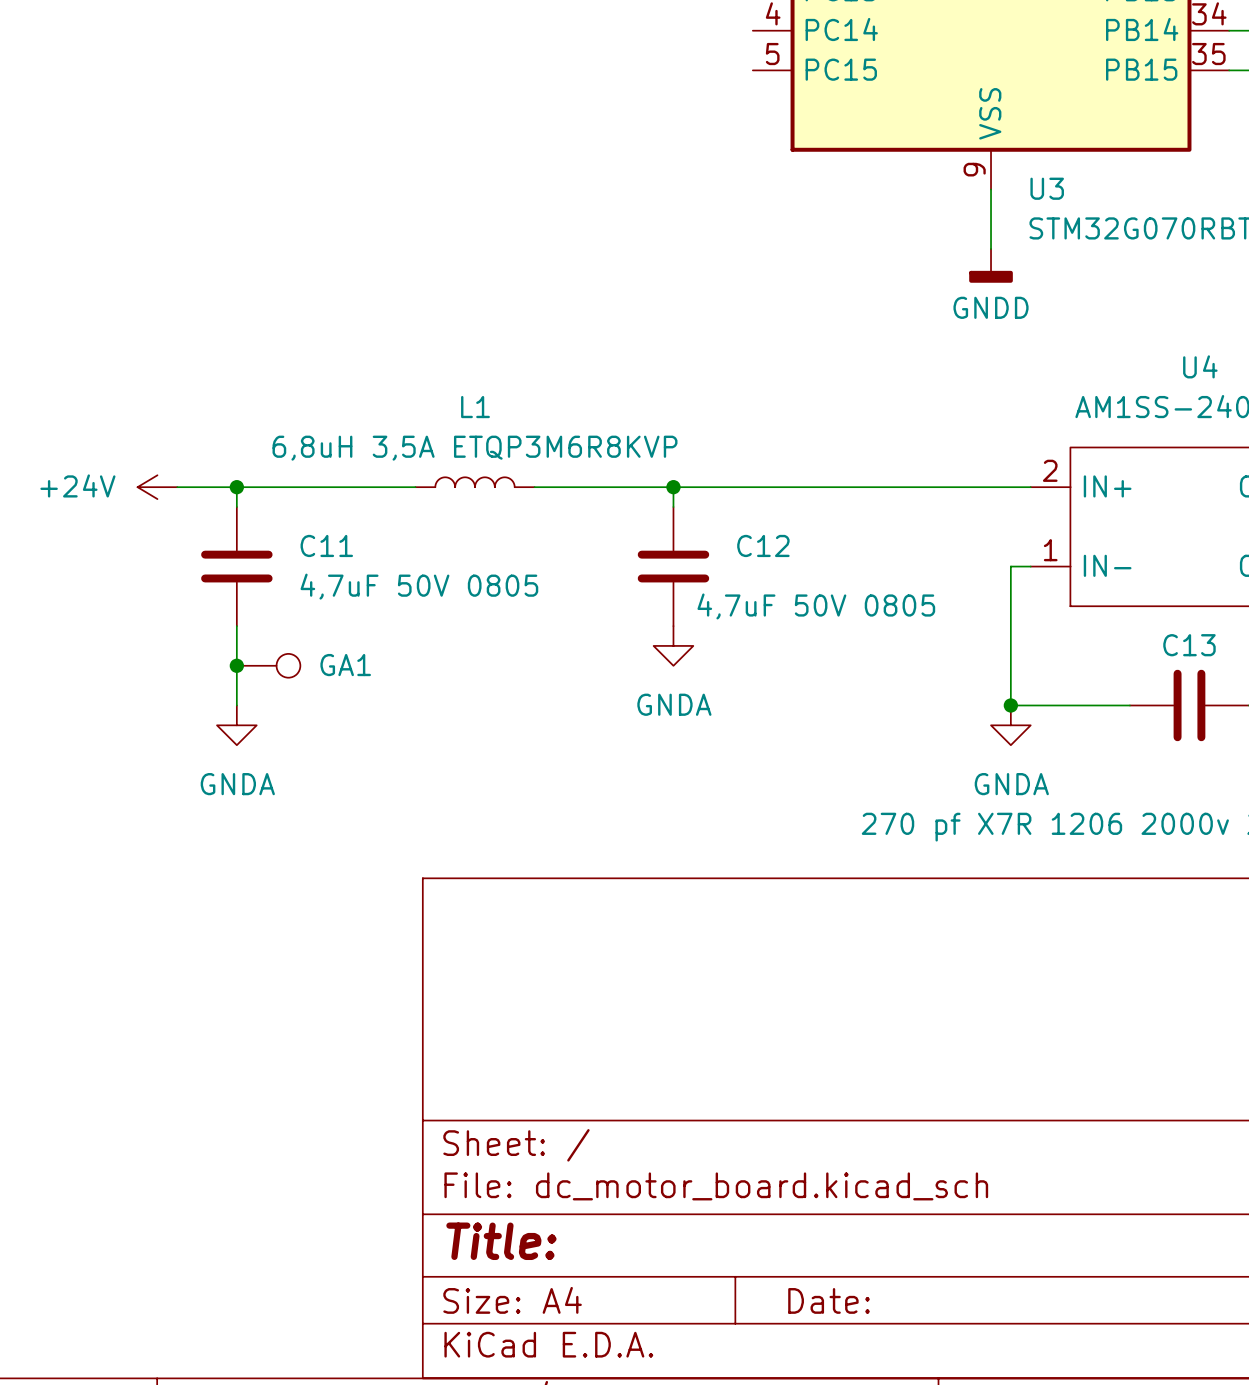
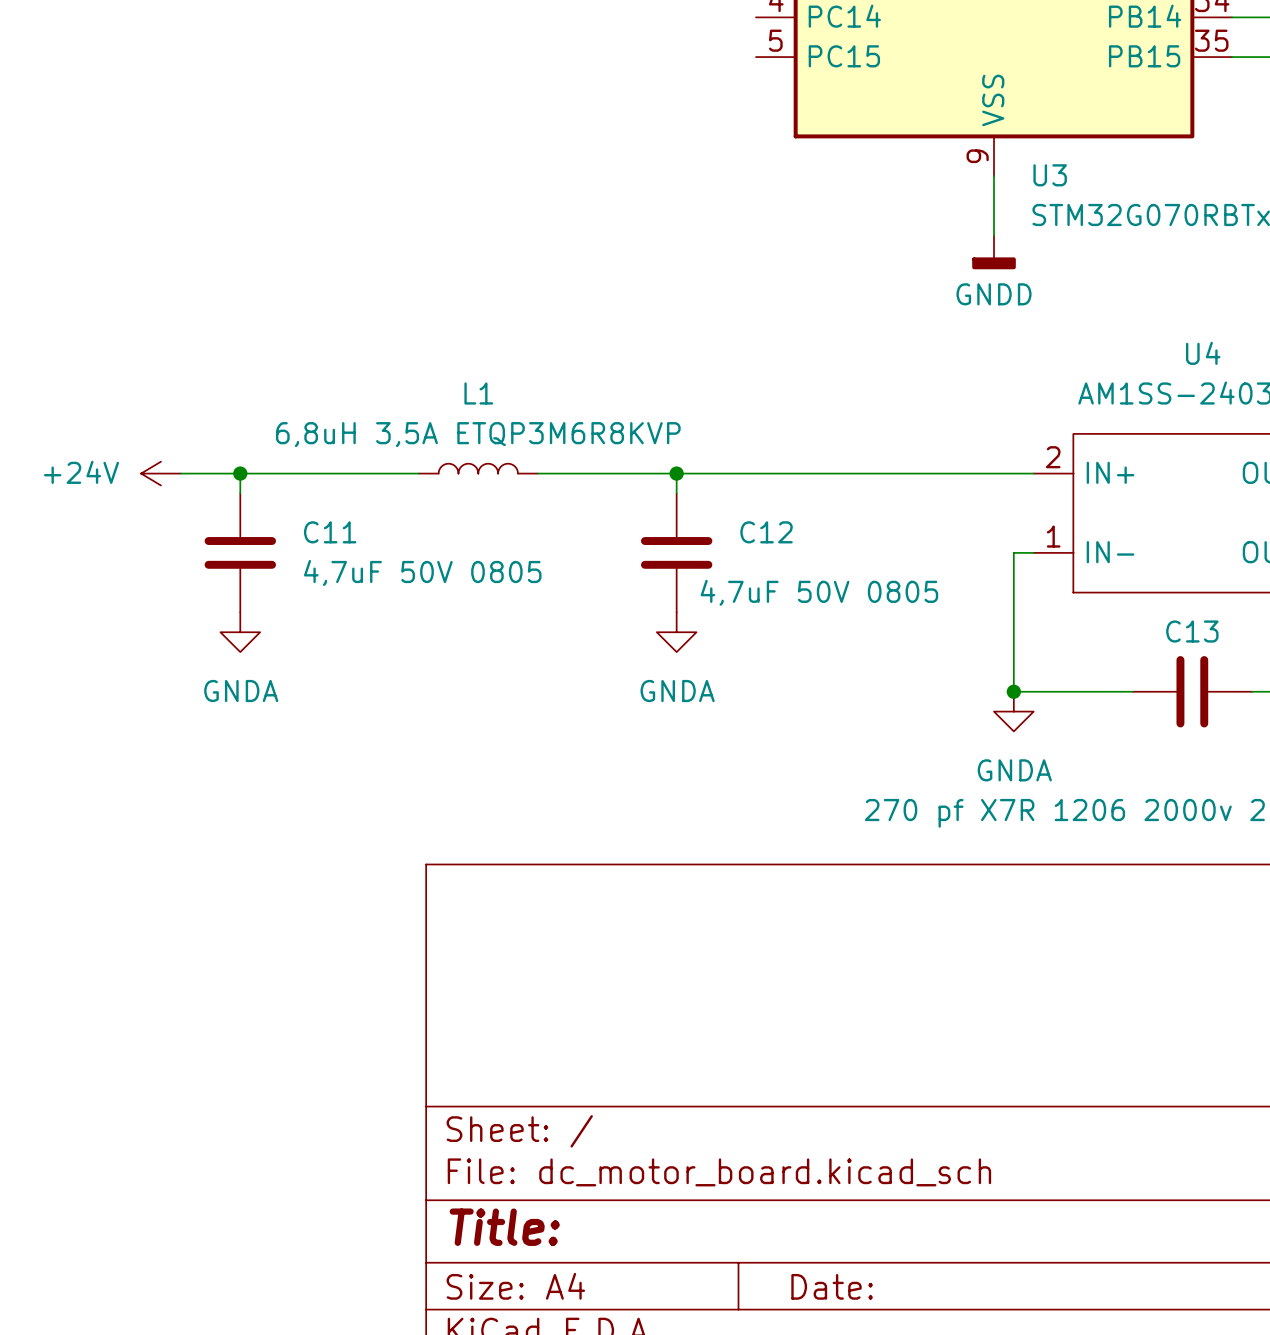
wire: (236, 626) (236, 705) -> none
junction: (236, 665) -> none
GA1: (268, 665) -> none
power symbol position: GNDA (236, 725) -> GNDA (240, 632)

